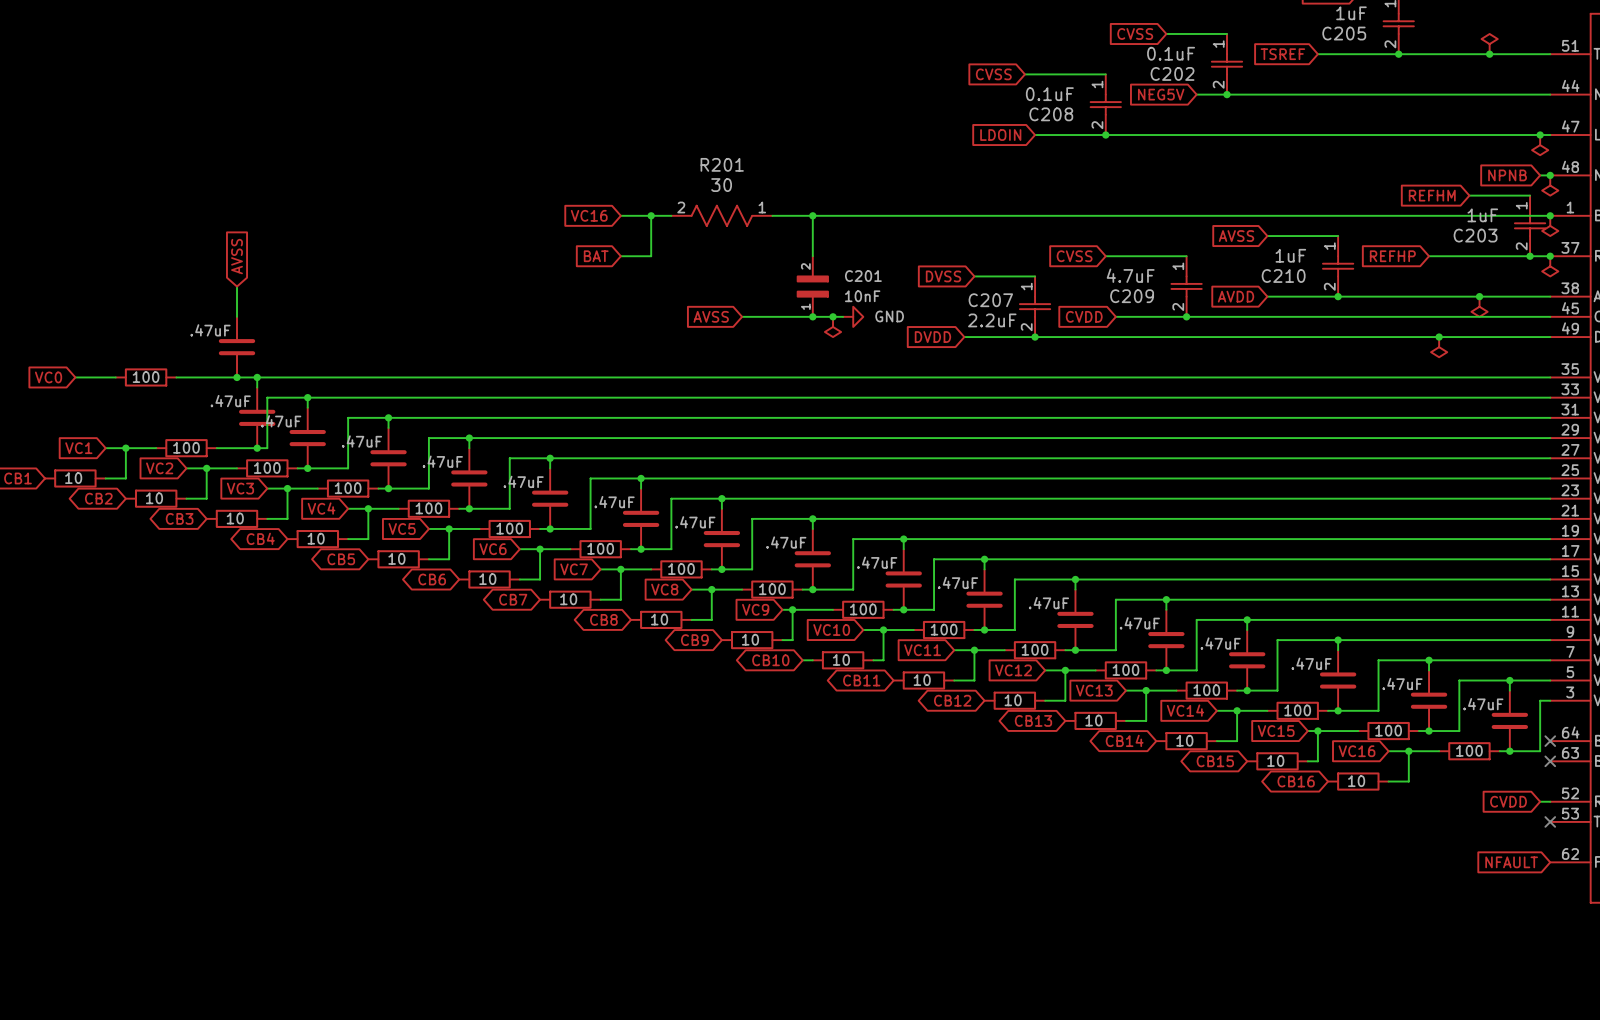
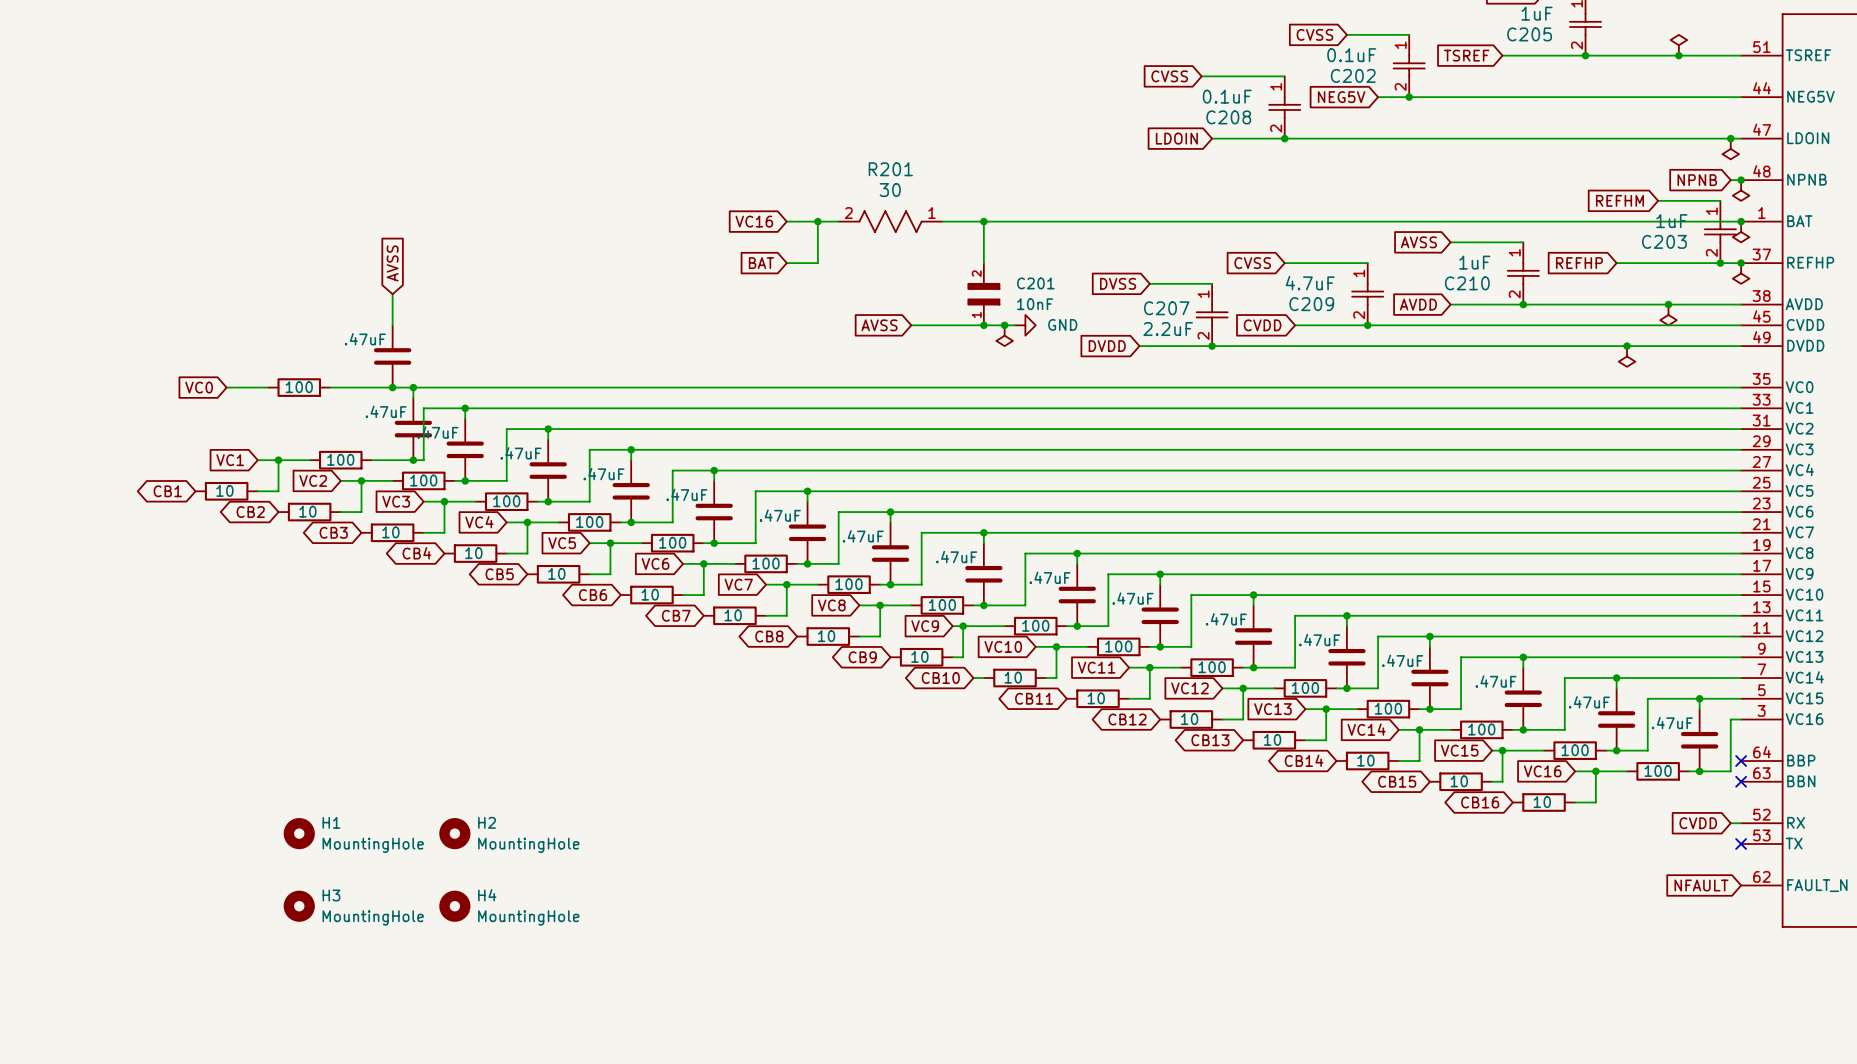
H1: none -> MountingHole (299, 833)
H2: none -> MountingHole (454, 833)
H3: none -> MountingHole (299, 906)
H4: none -> MountingHole (454, 906)

